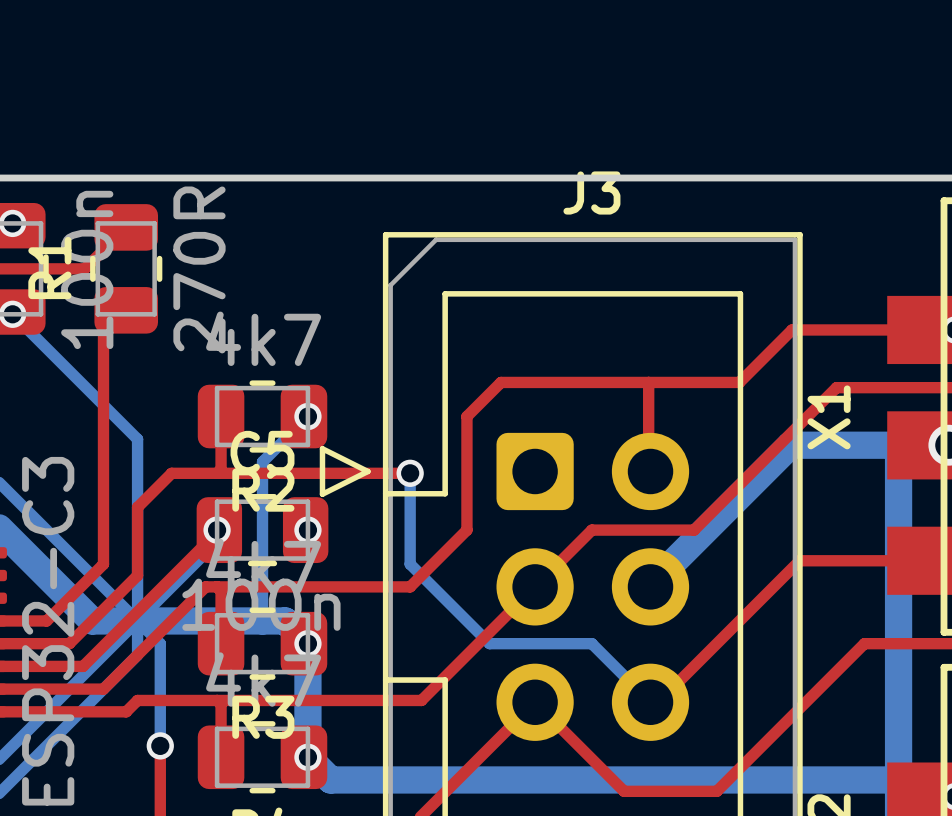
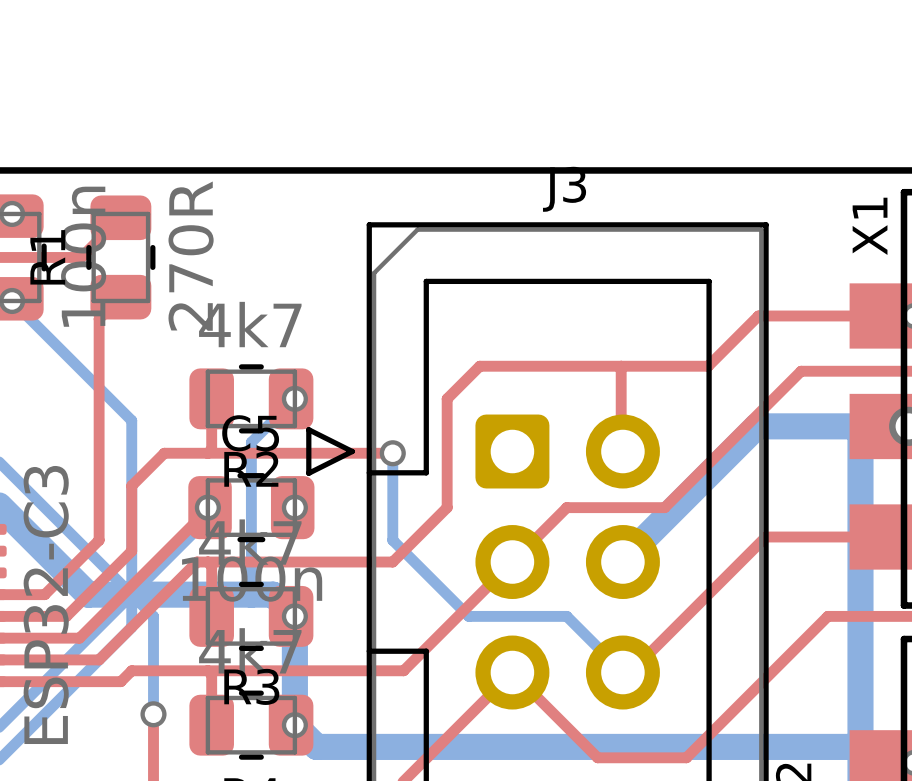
X1 name position: X1 (829, 417) -> X1 (870, 226)

